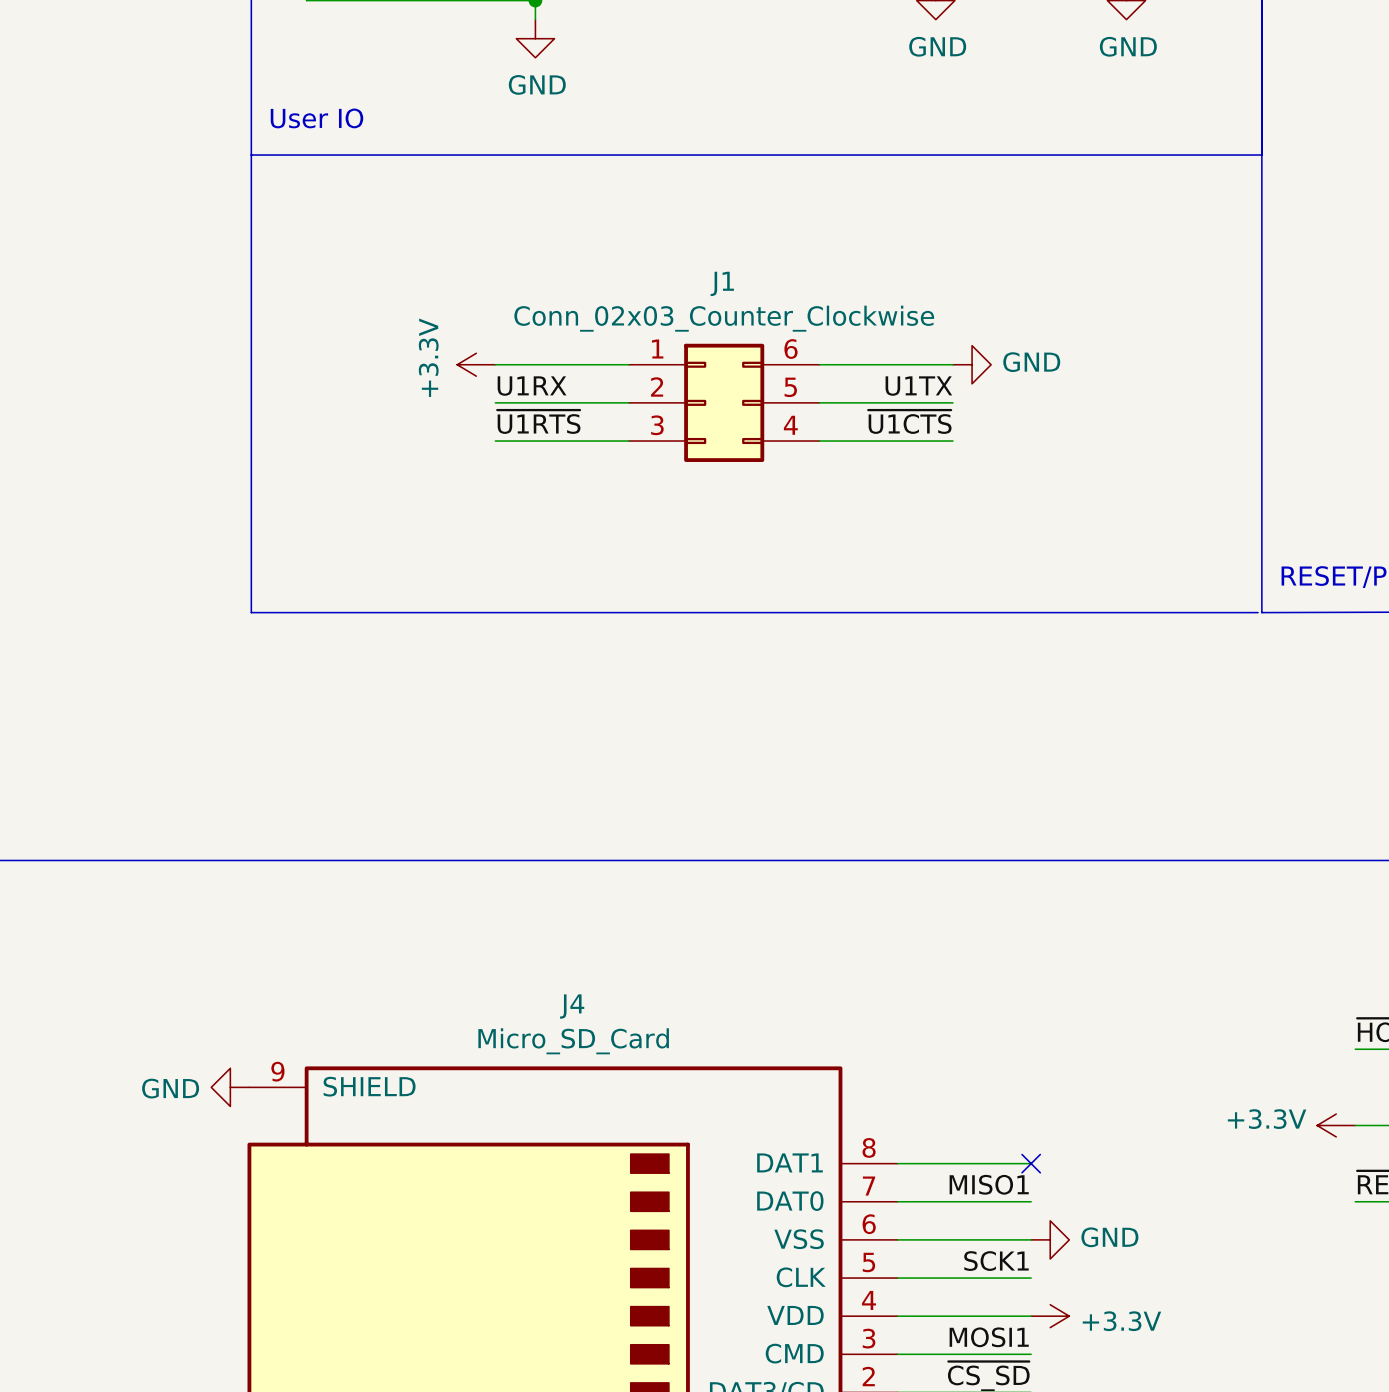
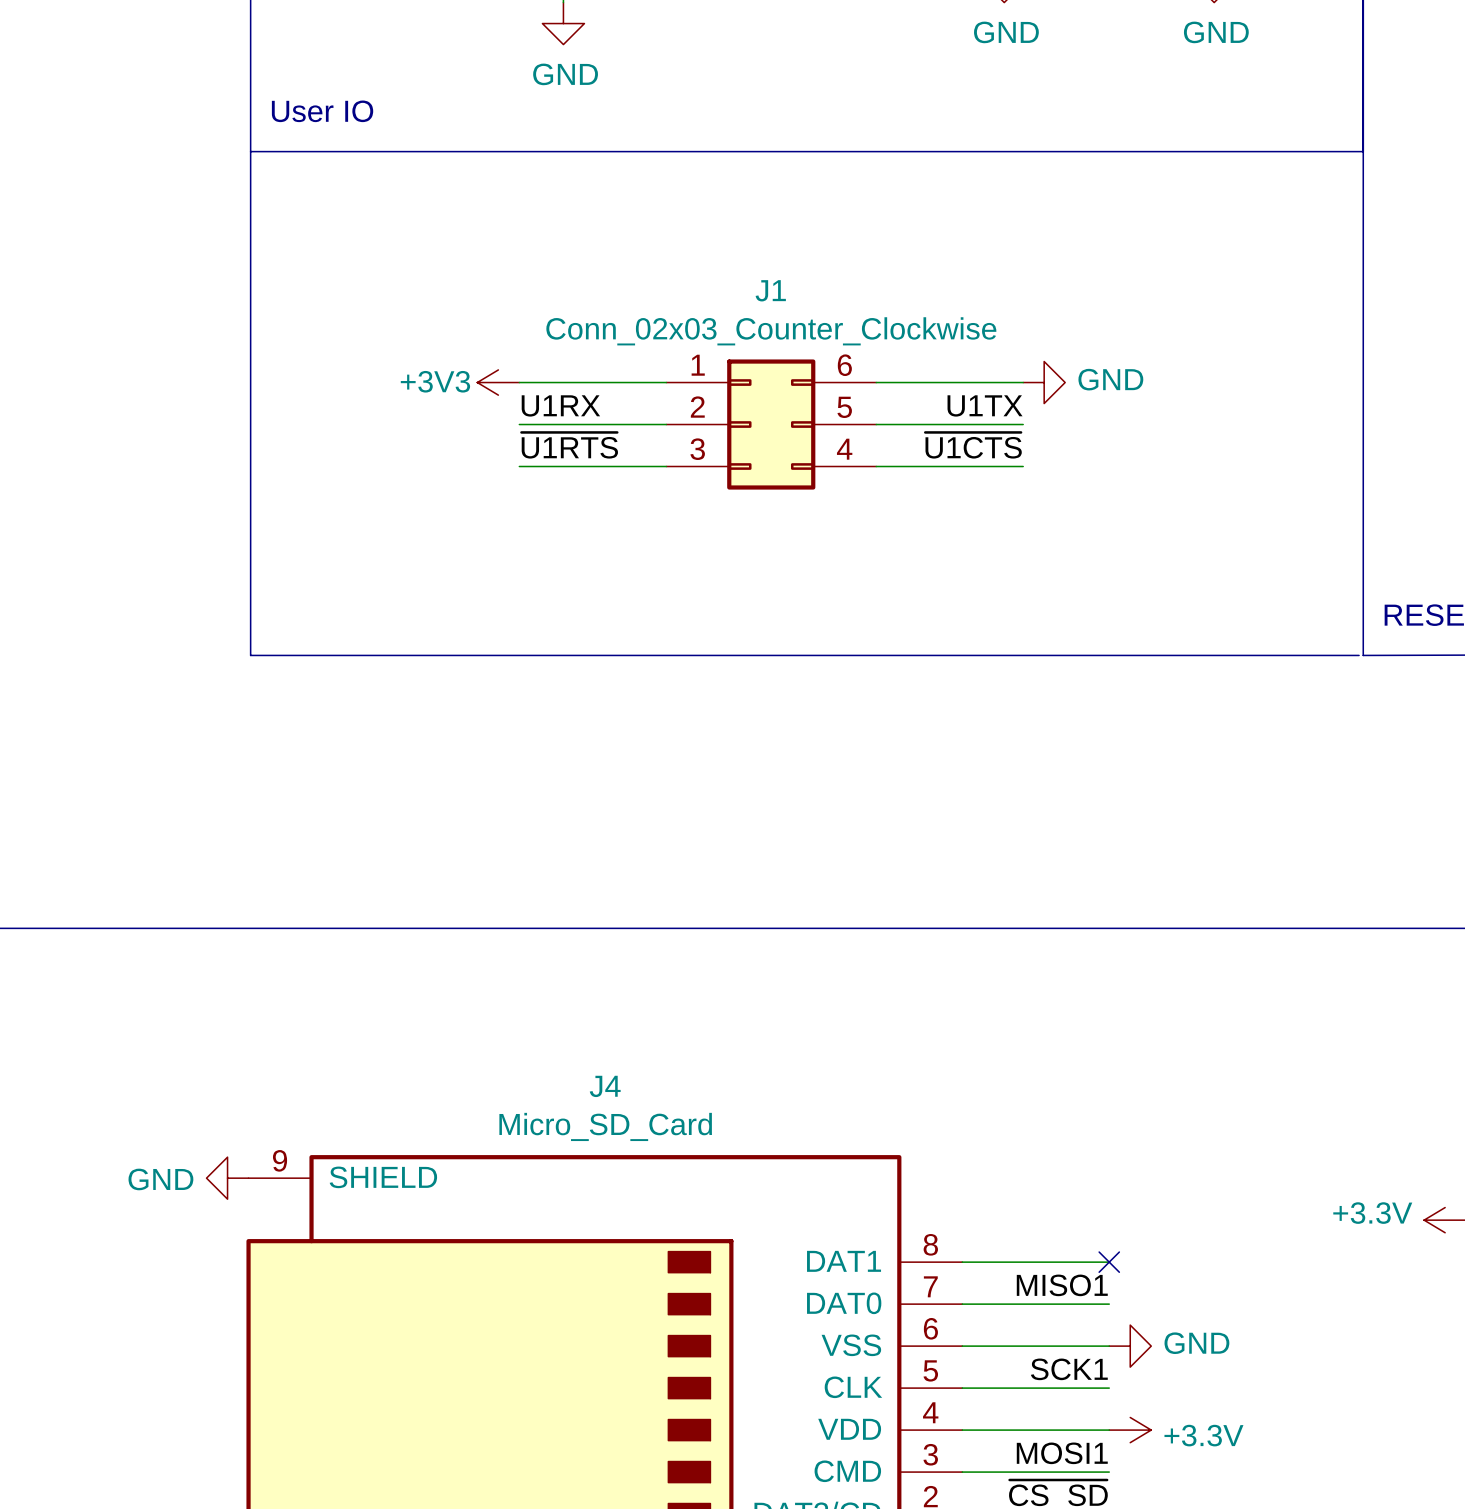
power symbol: +3.3V (476, 364) -> +3V3 (498, 382)

